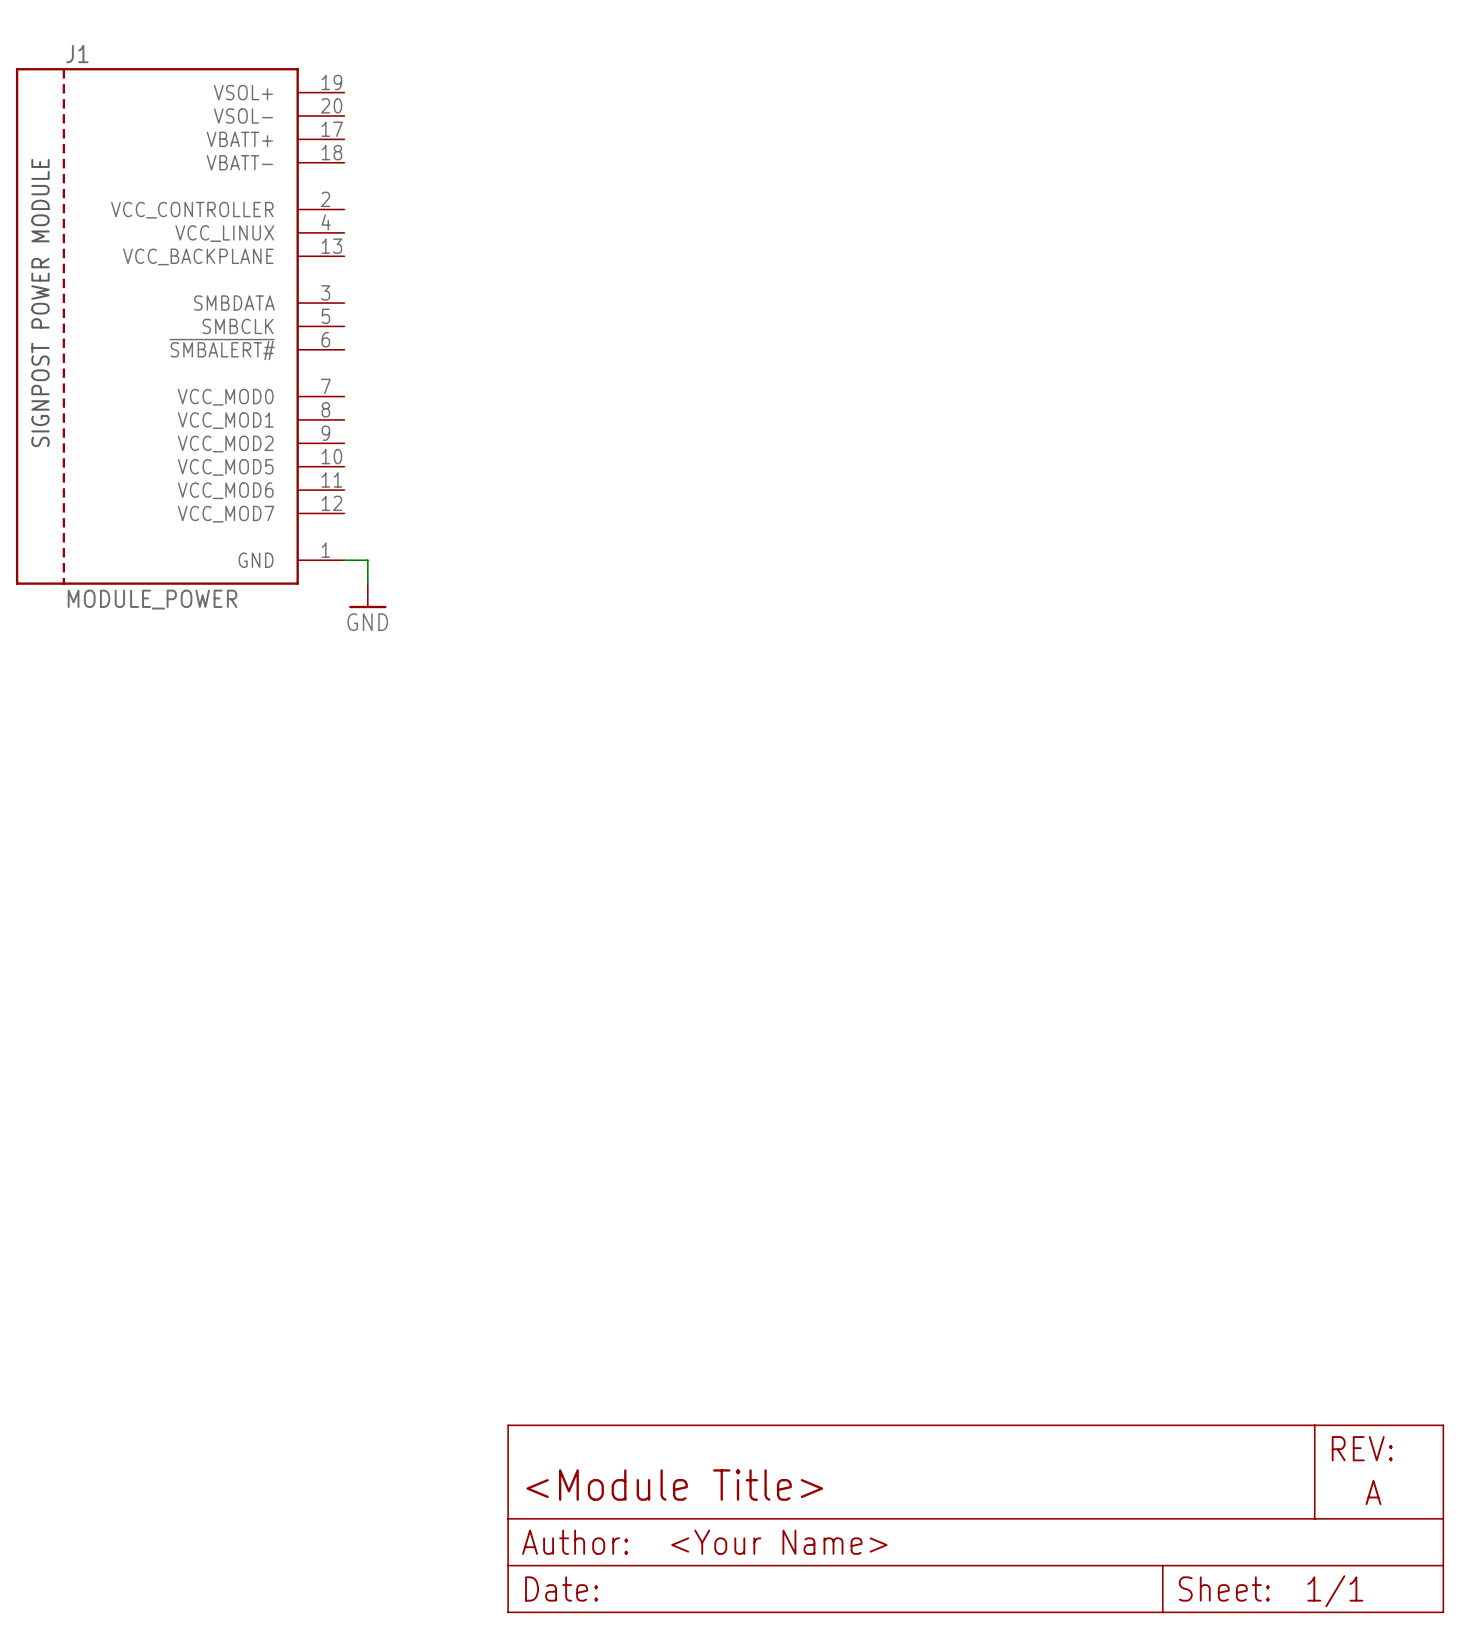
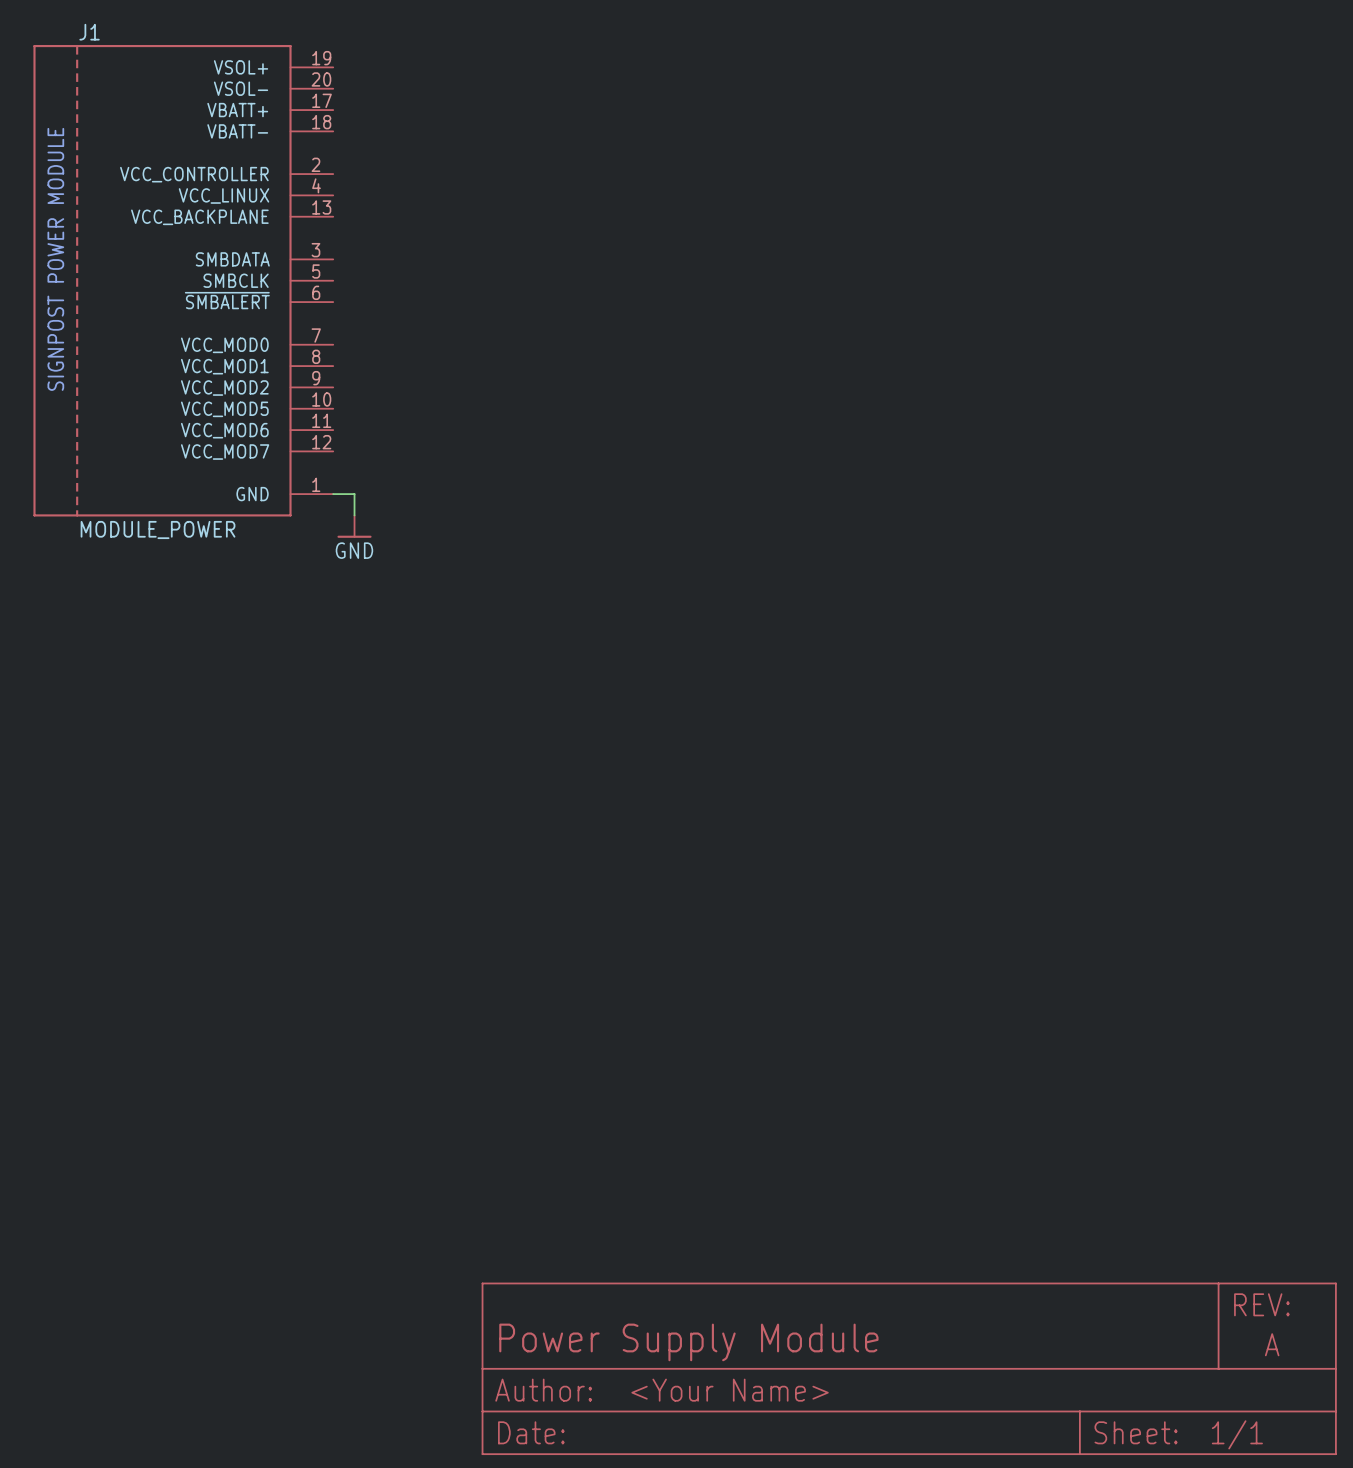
J1 pin name: ~{SMBALERT#} (222, 349) -> ~{SMBALERT} (227, 300)
part text: <Module Title> (674, 1485) -> Power Supply Module (688, 1342)

